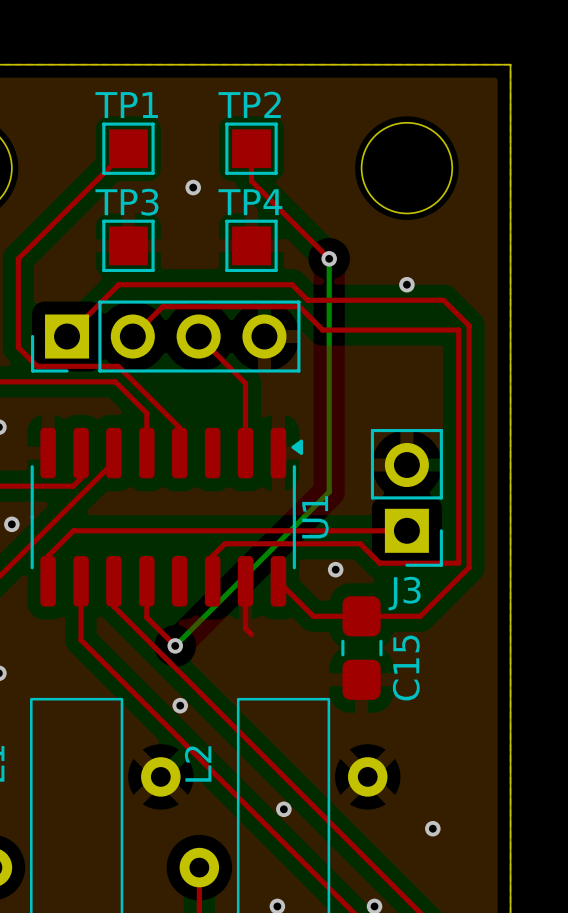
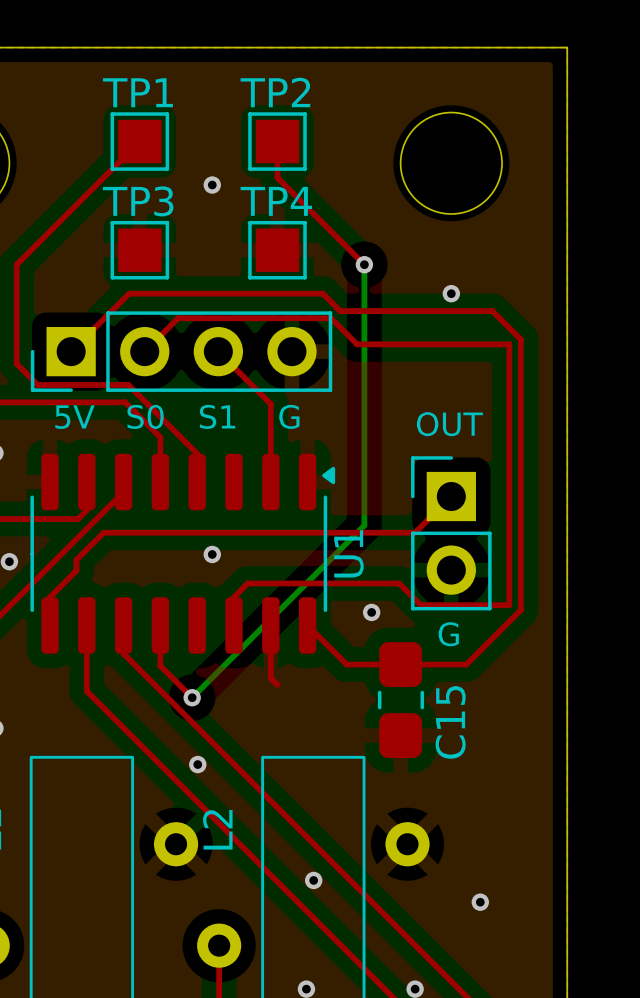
text: none -> S0 (145, 416)
text: none -> S1 (217, 416)
text: none -> G (289, 416)
text: none -> 5V (74, 417)
text: none -> OUT (449, 424)
J3: (406, 497) -> none
part: none -> (451, 533)
via: none -> (212, 554)
top track: (406, 530) (73, 530) (71, 532) -> (451, 496) (415, 532) (103, 532) (76, 559) (76, 570)
text: none -> G (448, 634)

